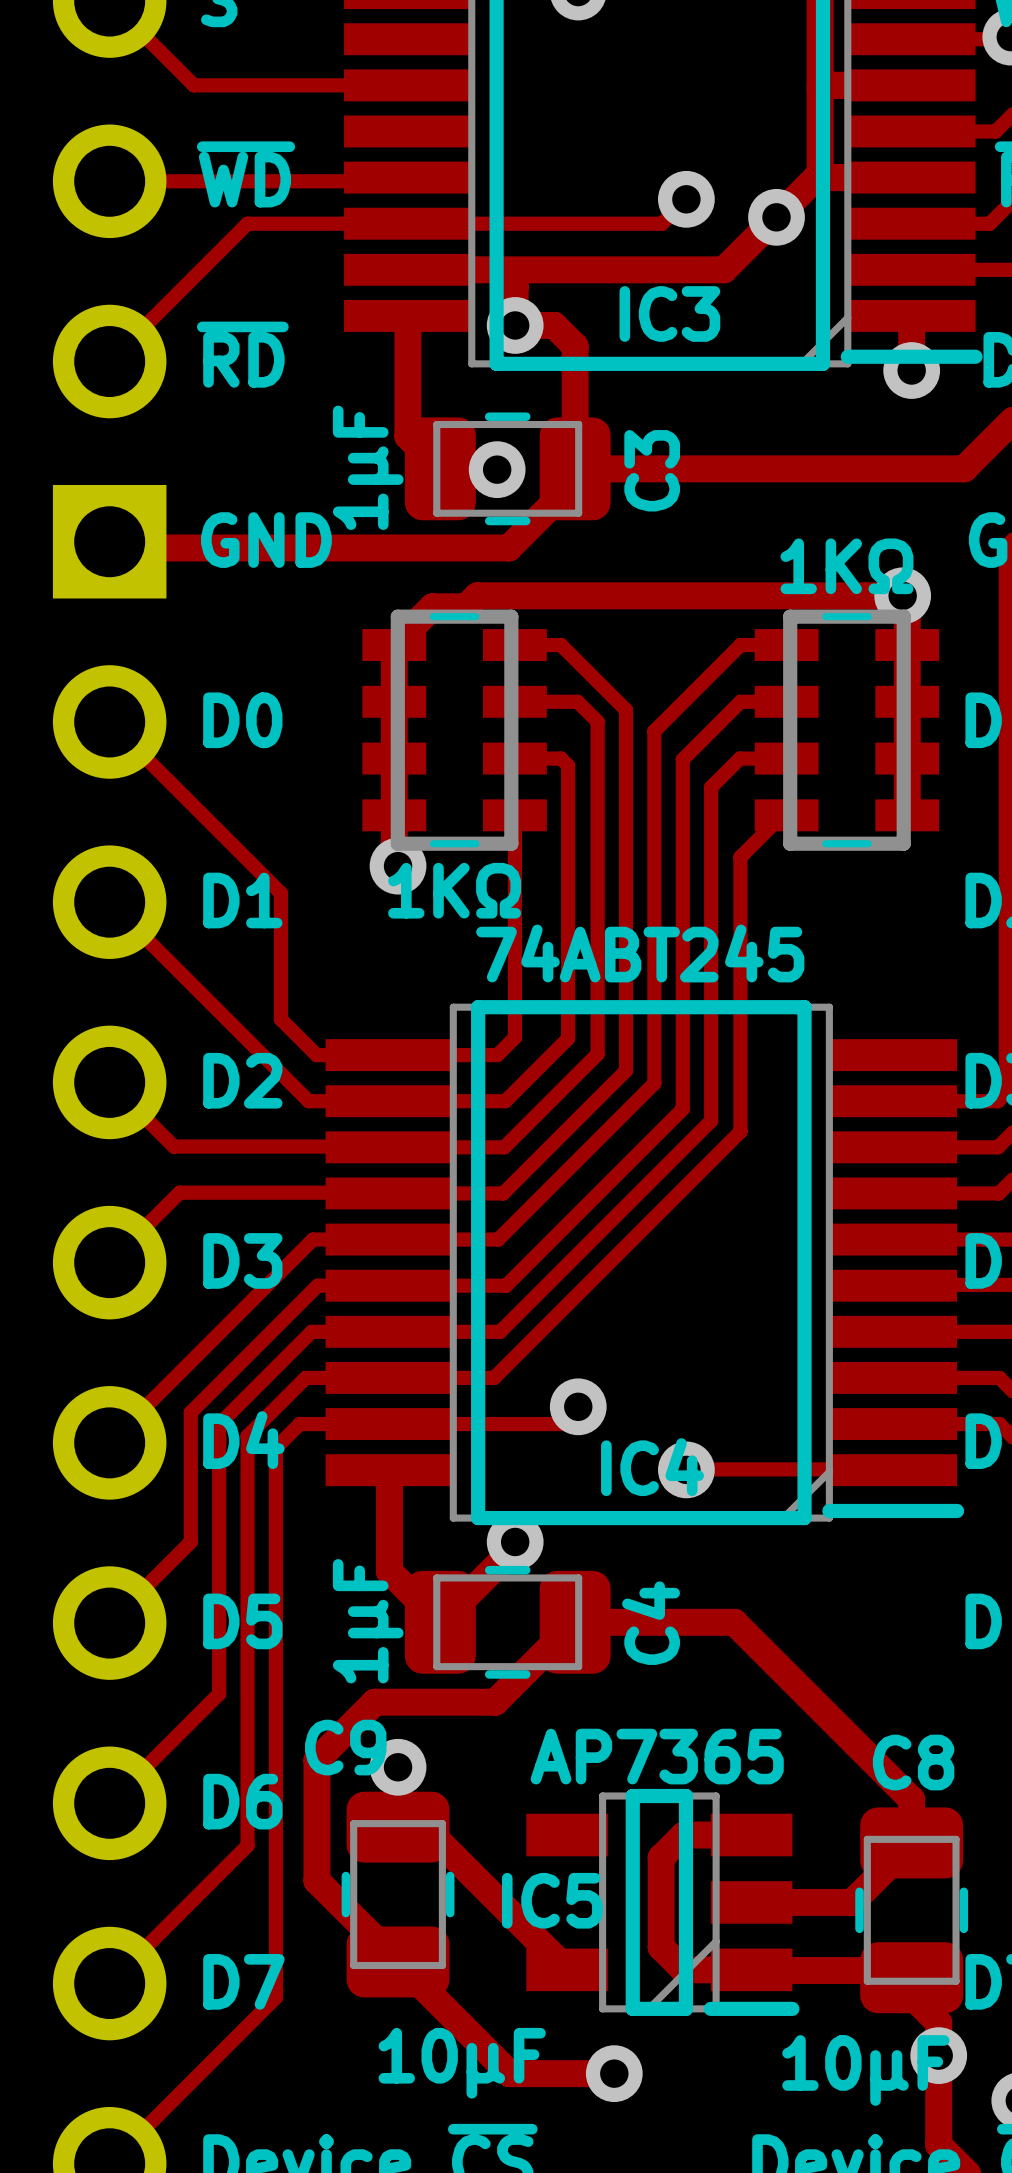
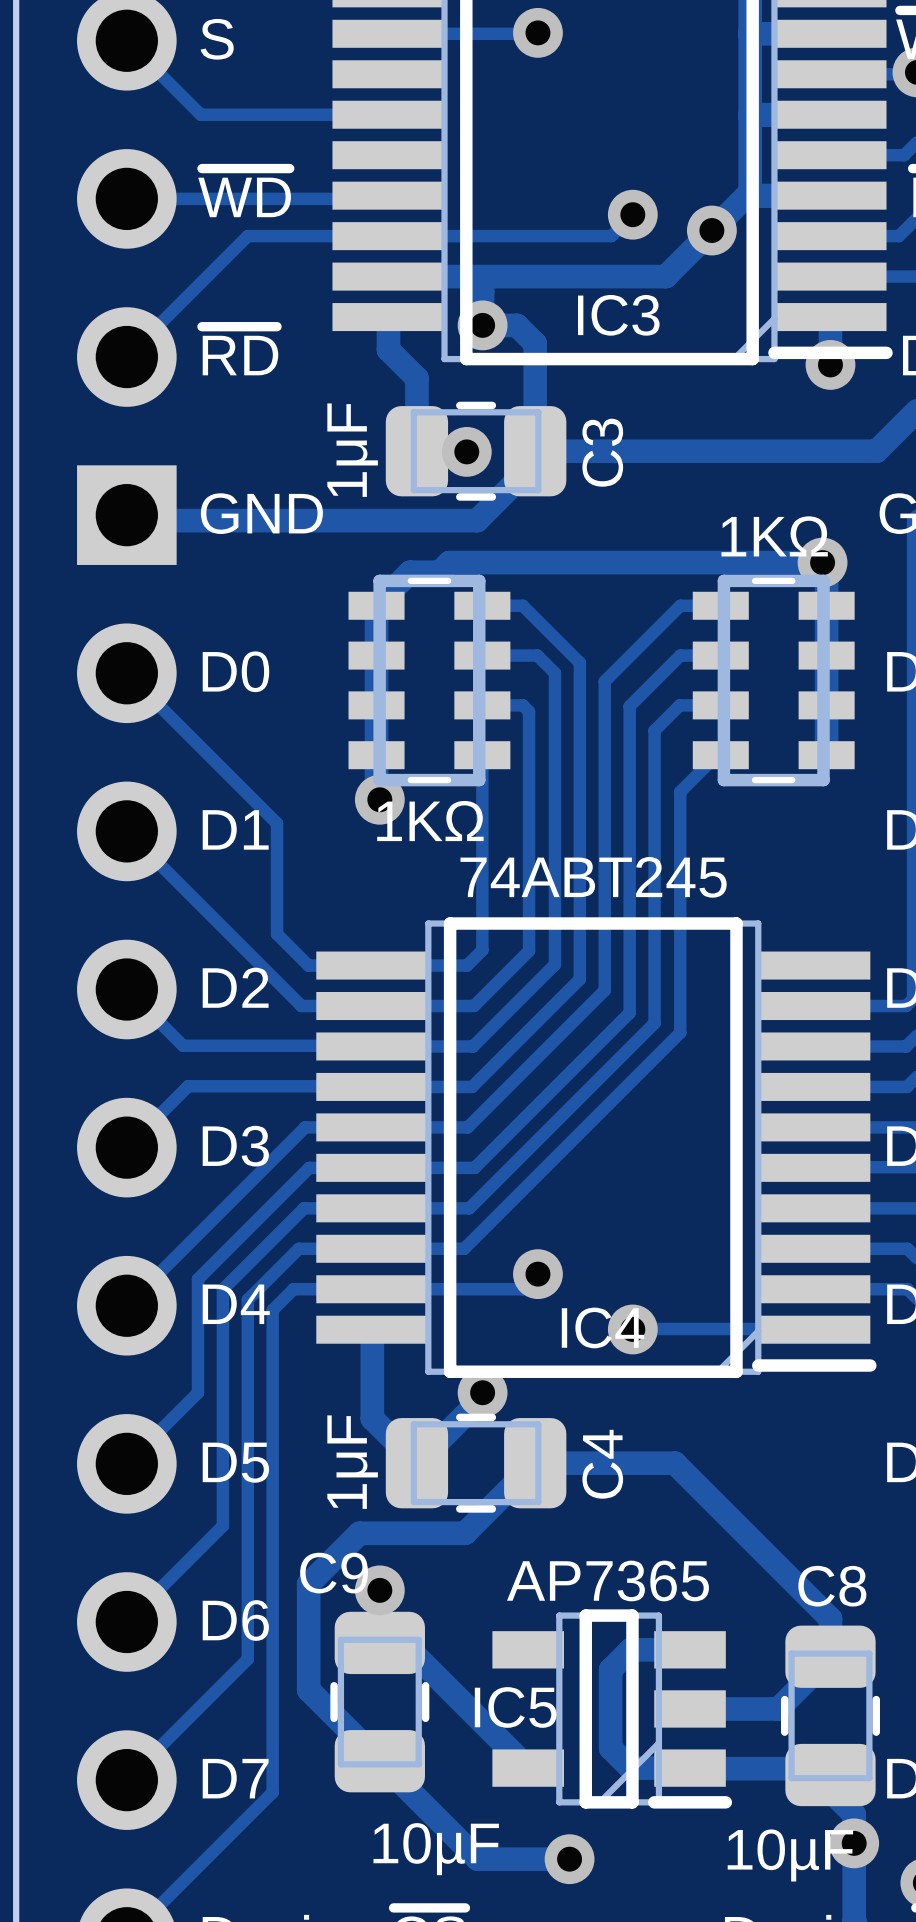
track: (407, 353) (407, 436) (440, 468) -> (388, 349) (416, 378) (416, 451)

